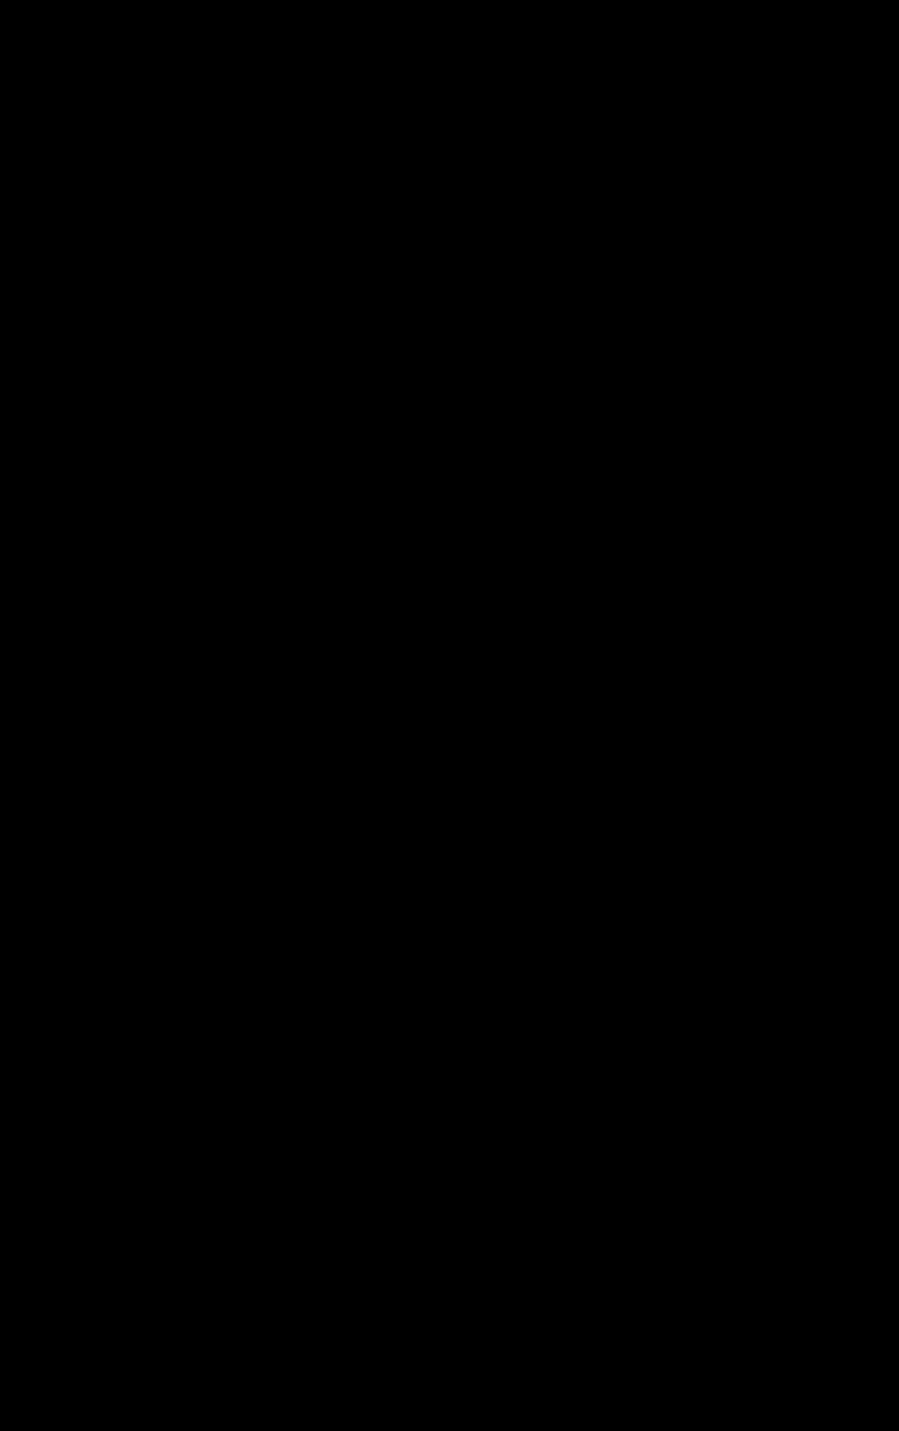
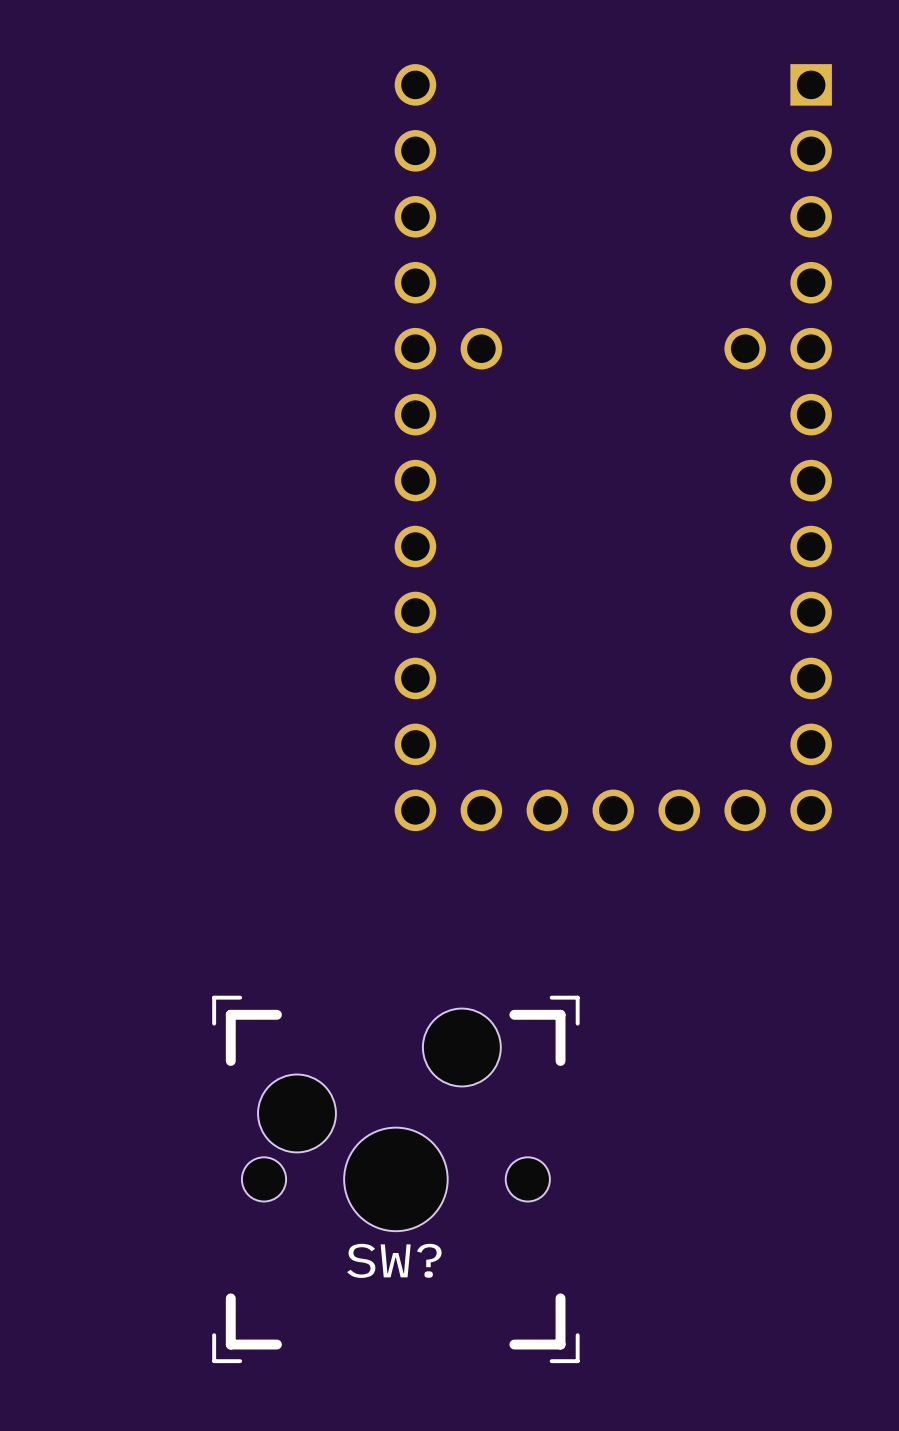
part: none -> (613, 447)
part: none -> (395, 1179)

